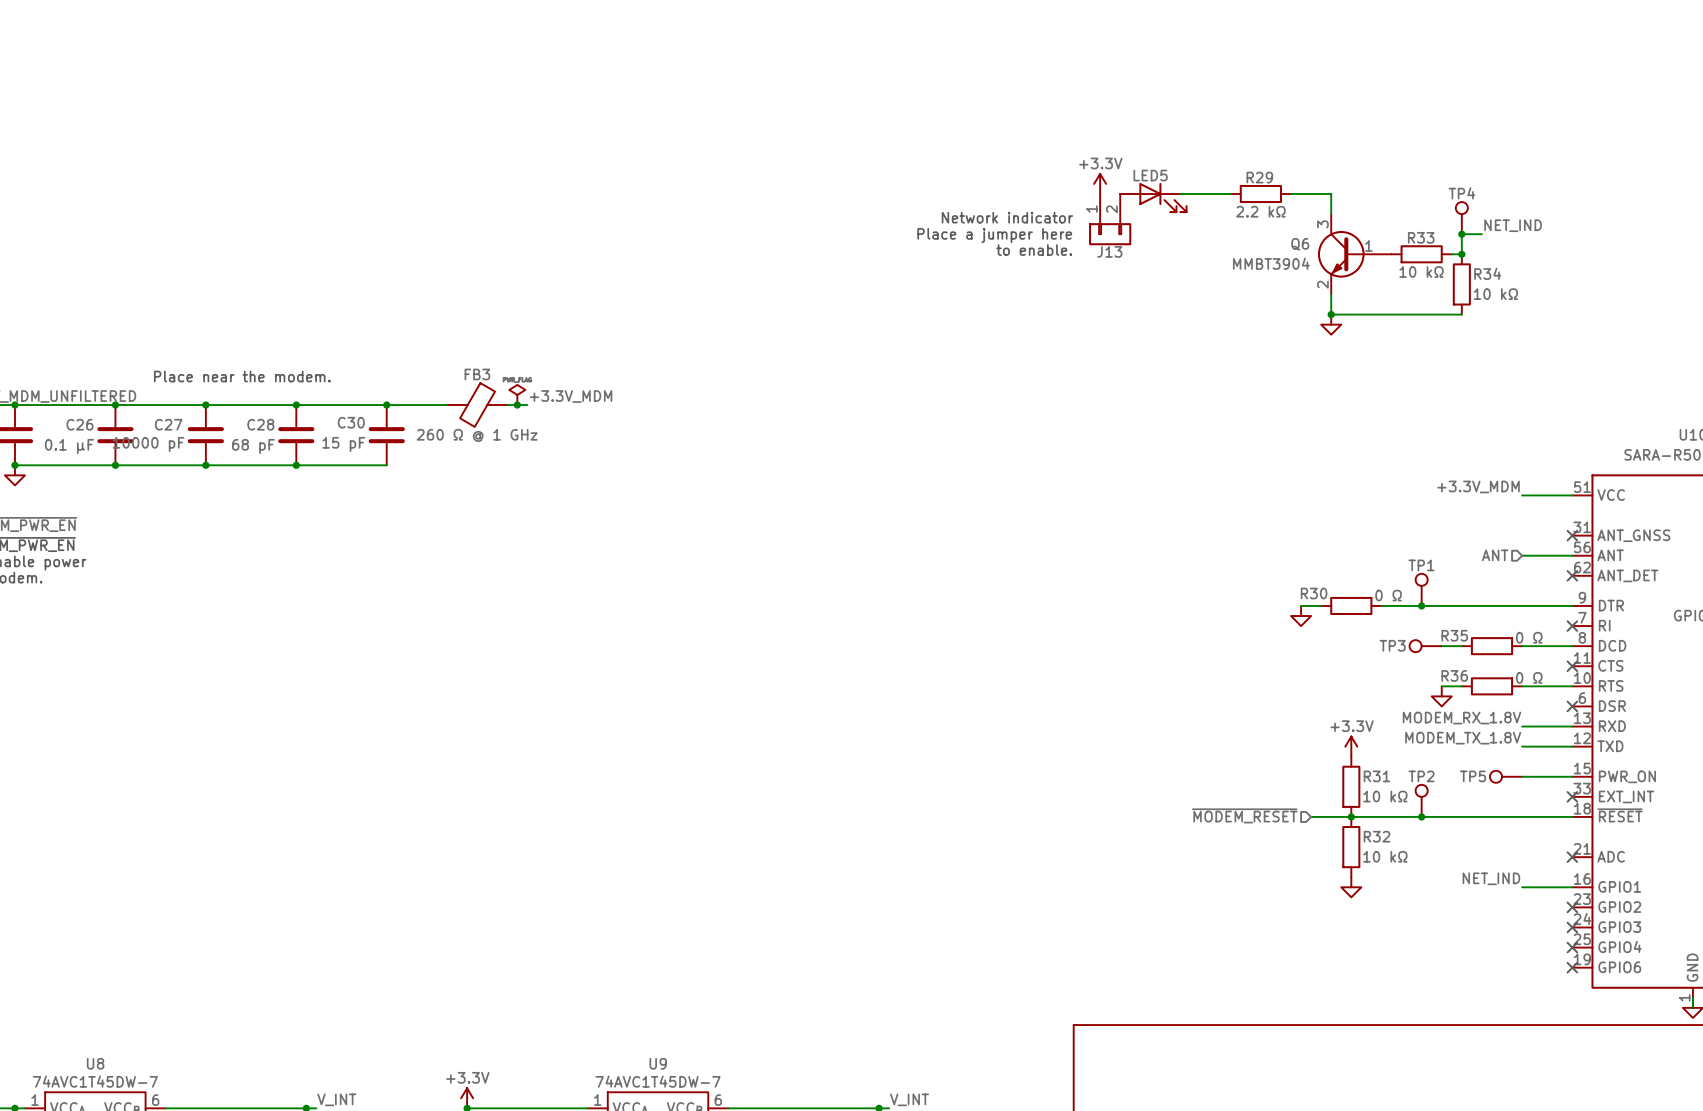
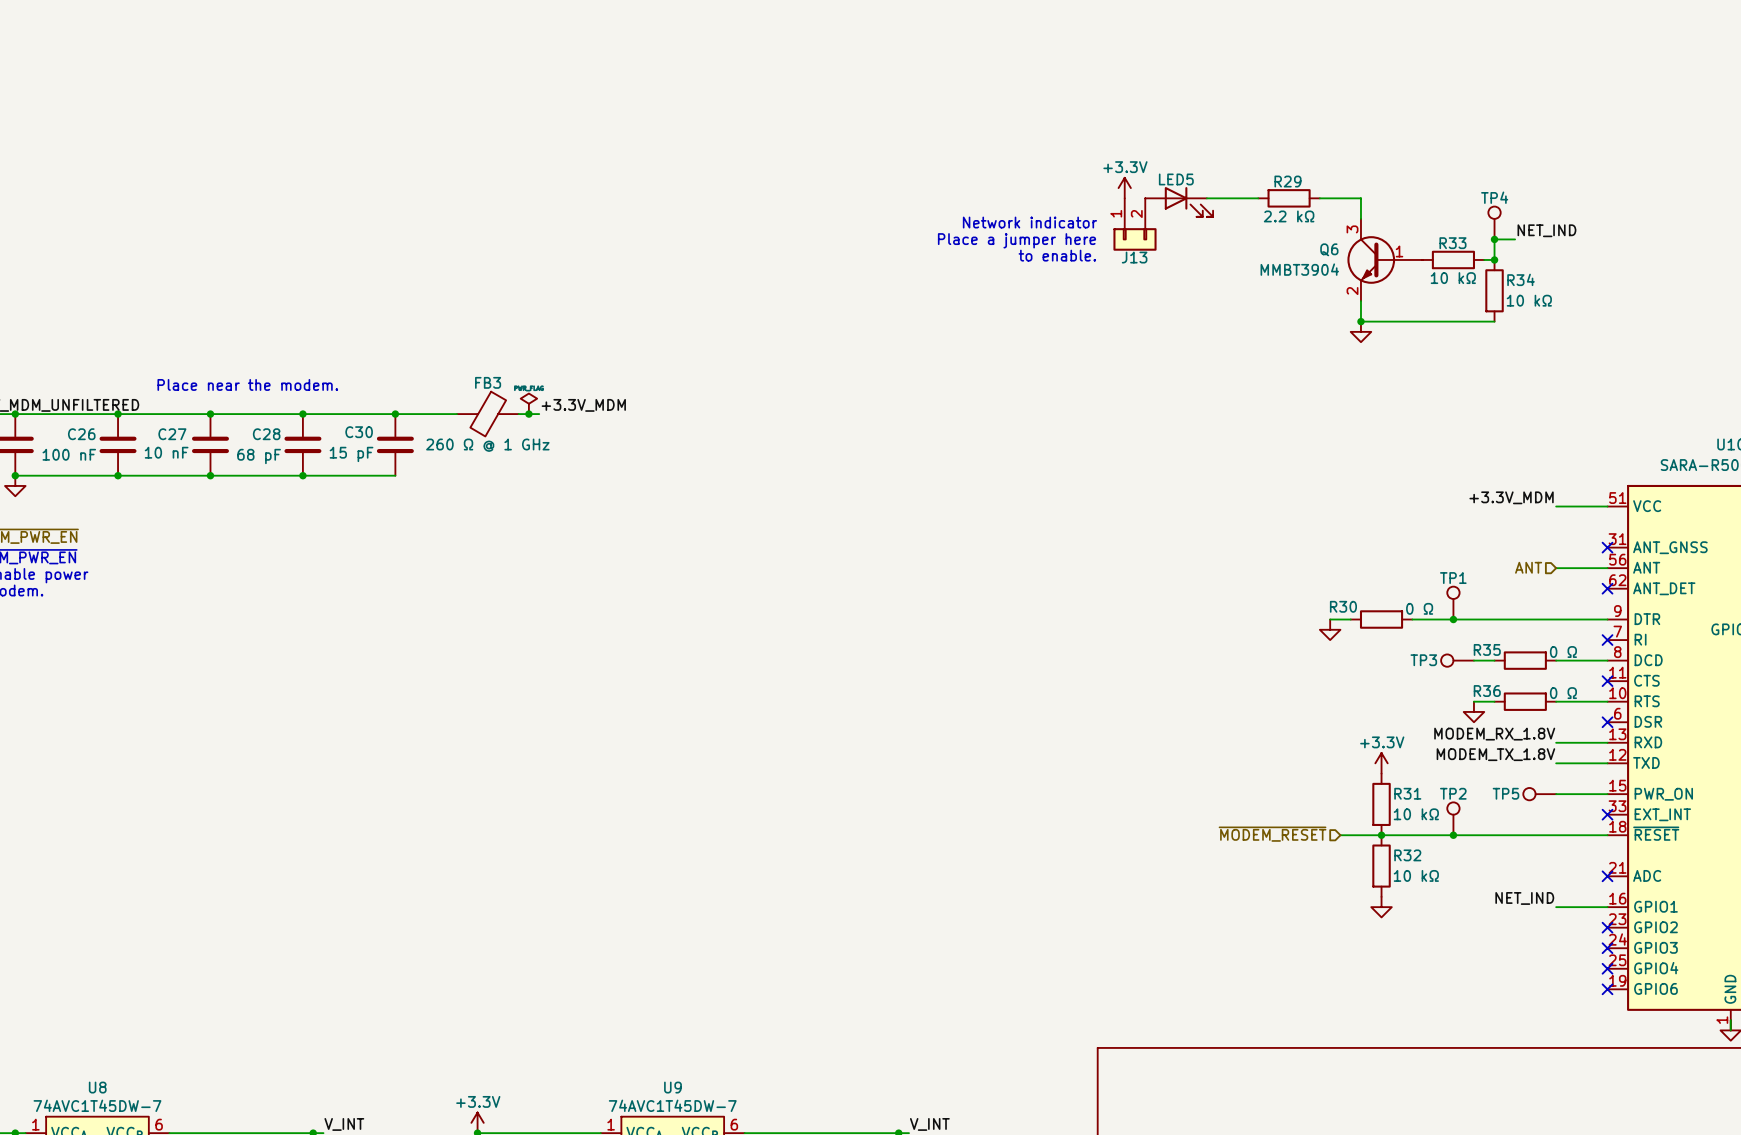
C27 value: 10000 pF (148, 444) -> 10 nF (166, 452)
C26 value: 0.1 µF (69, 446) -> 100 nF (69, 454)

